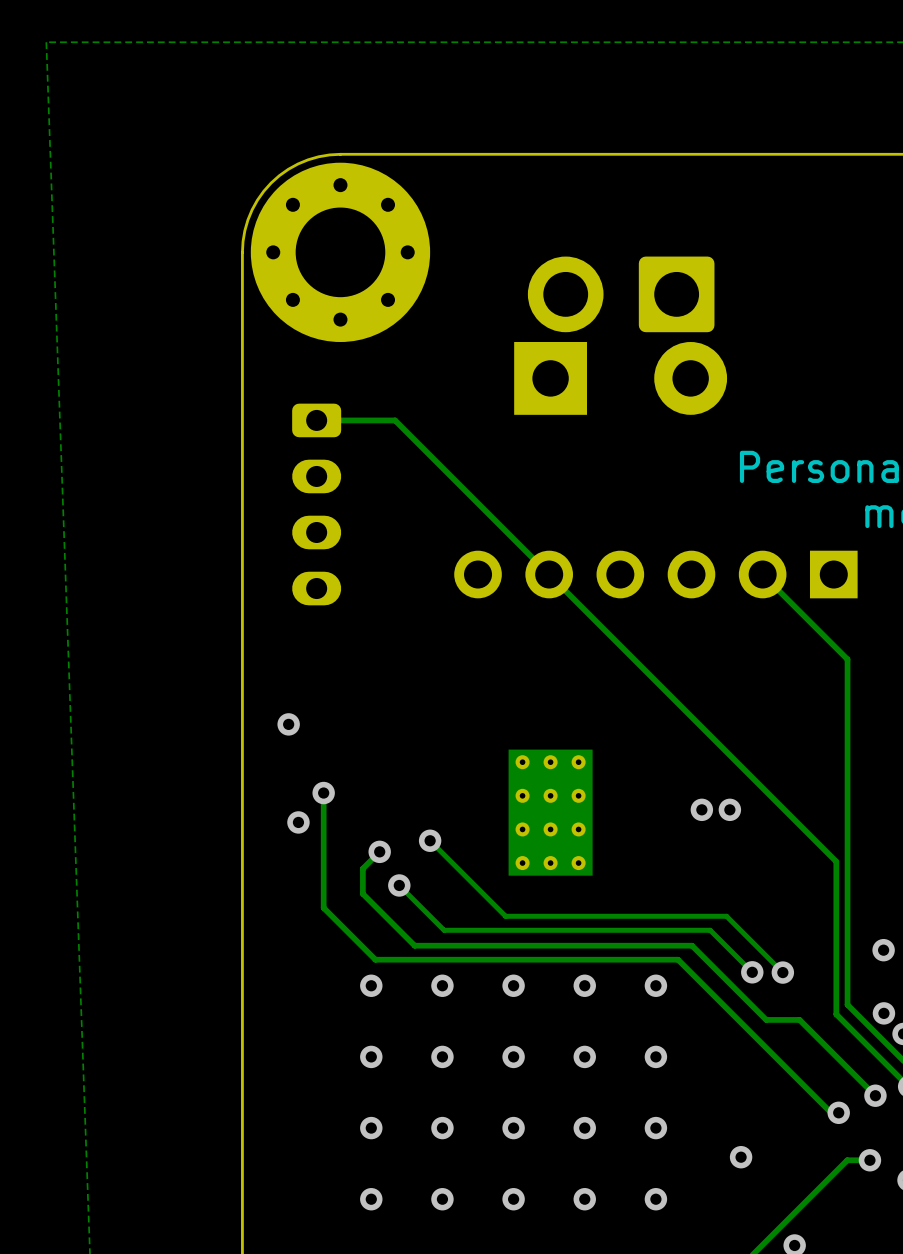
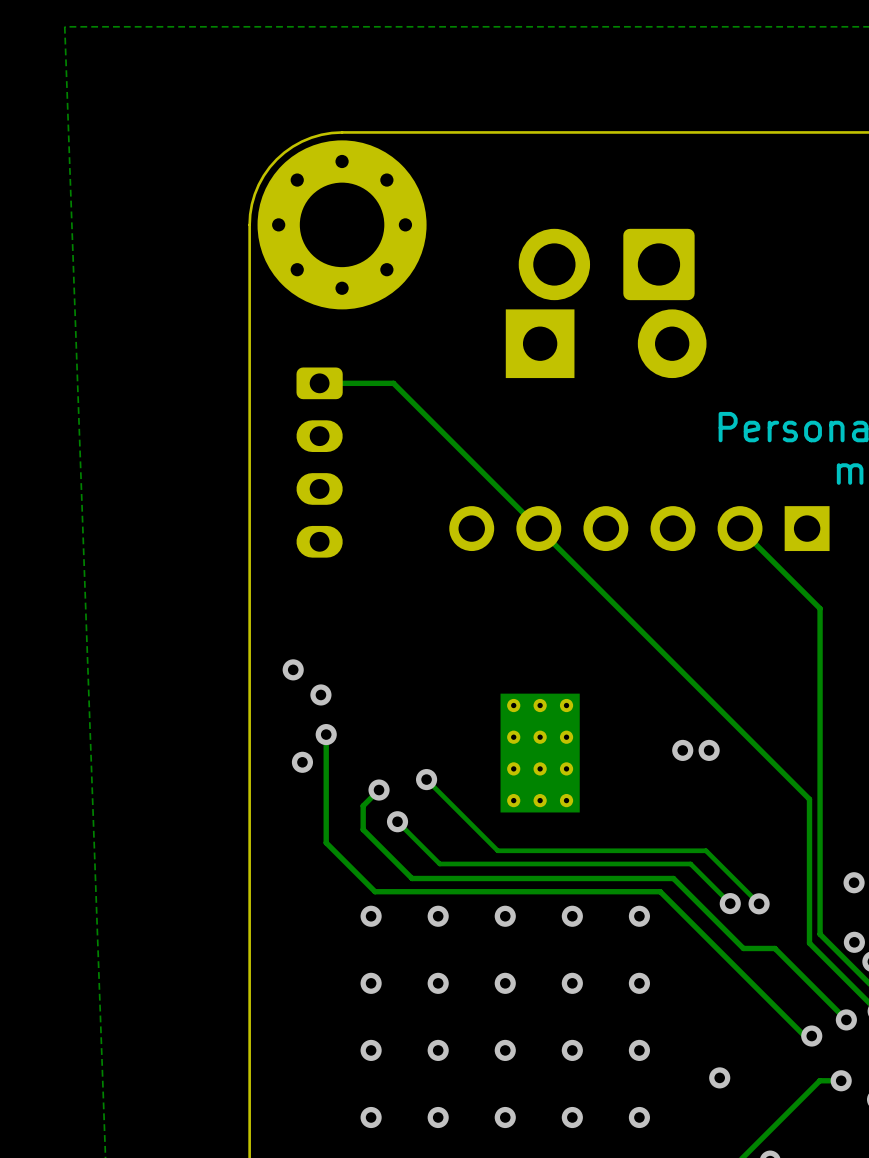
via: none -> (320, 694)

